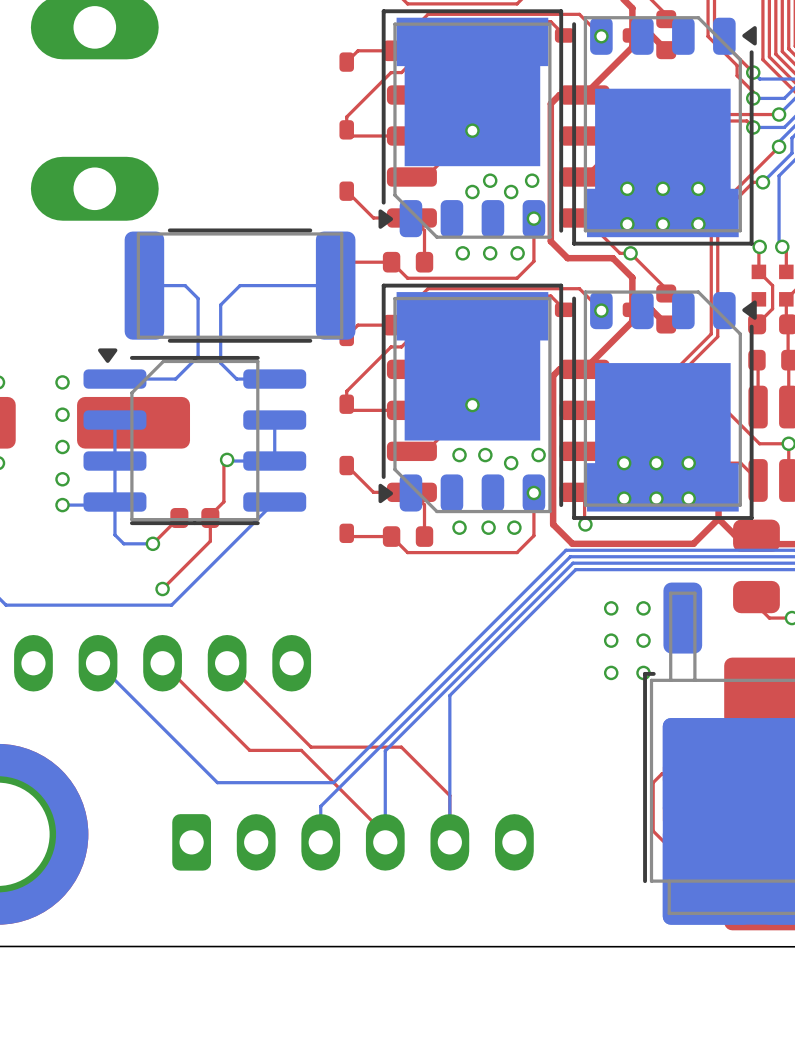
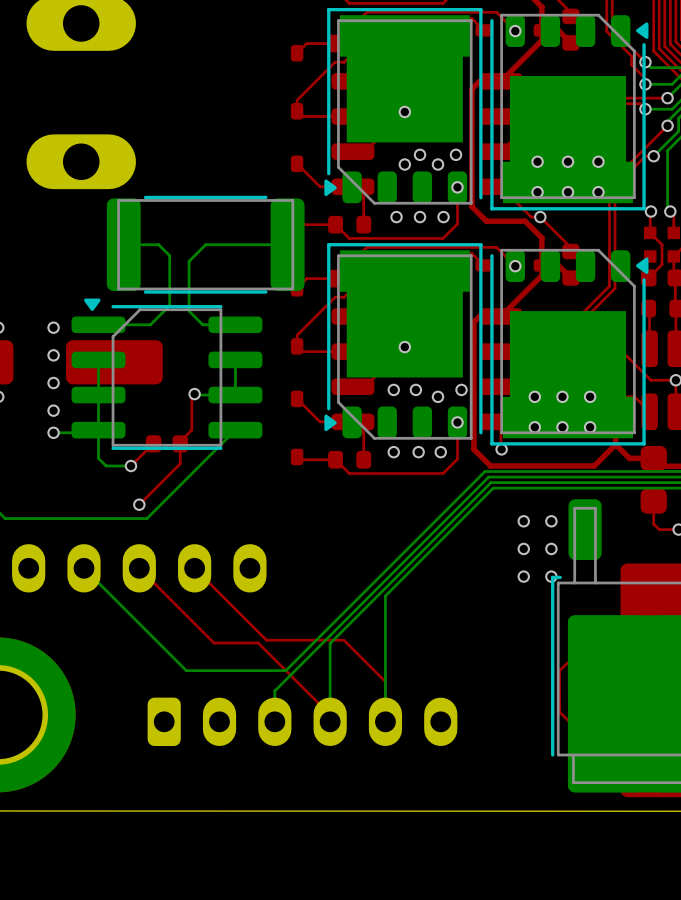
part footprint: [733, 519, 780, 614] -> [640, 445, 667, 514]

